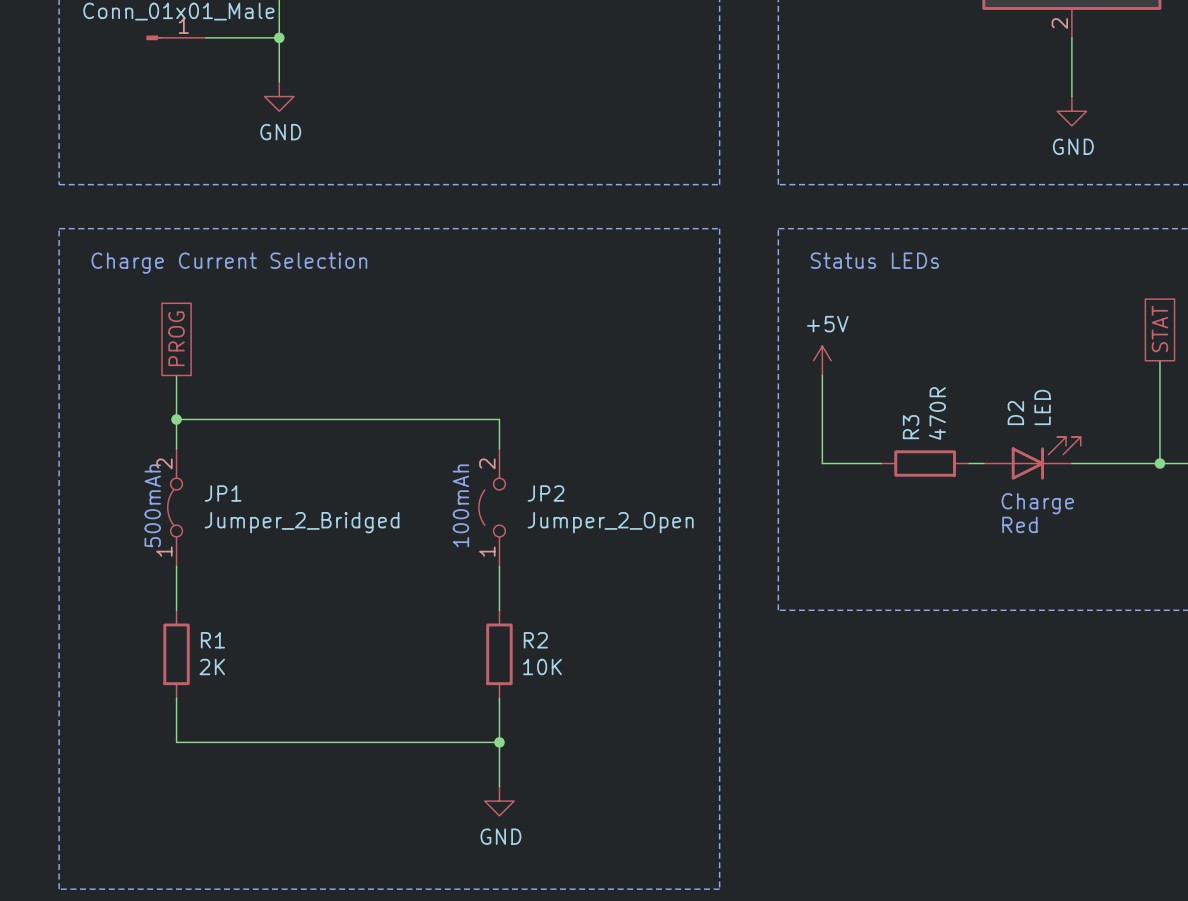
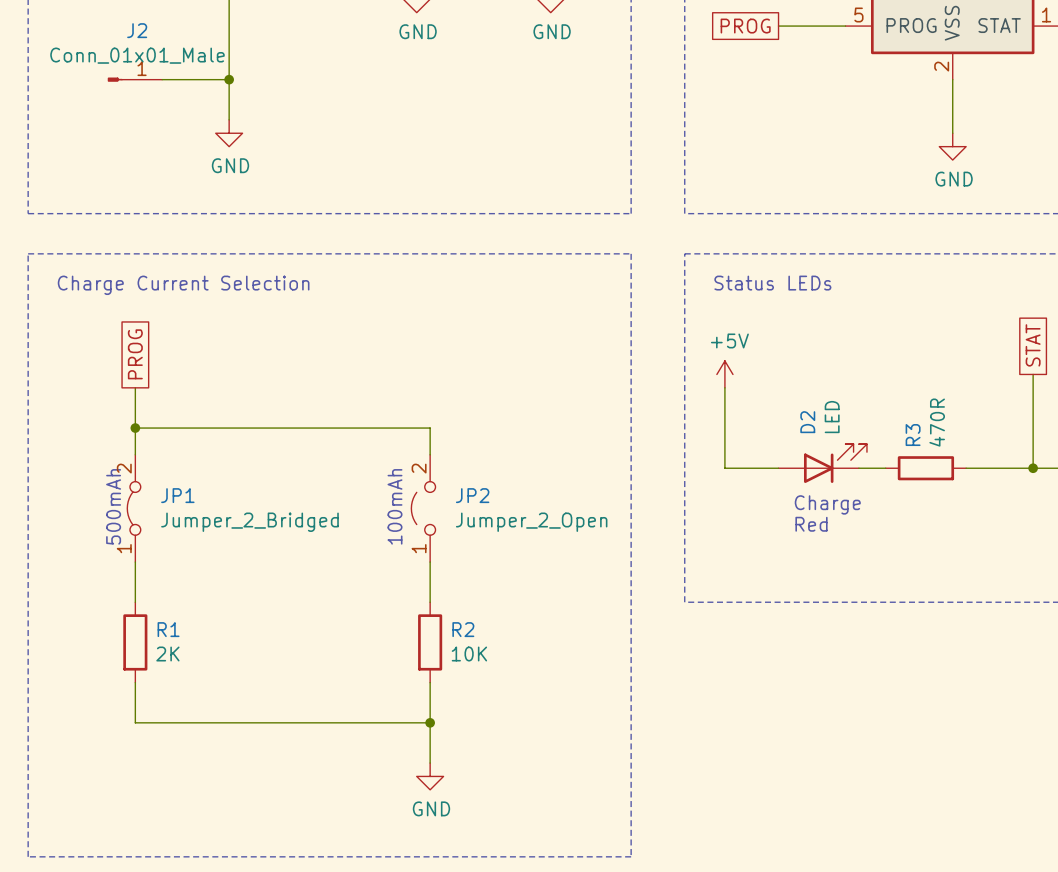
D2 position: (1032, 458) -> (822, 463)
R3 position: (925, 463) -> (925, 468)
text position: Charge (1037, 503) -> Charge (827, 504)
text position: Red (1019, 524) -> Red (811, 524)

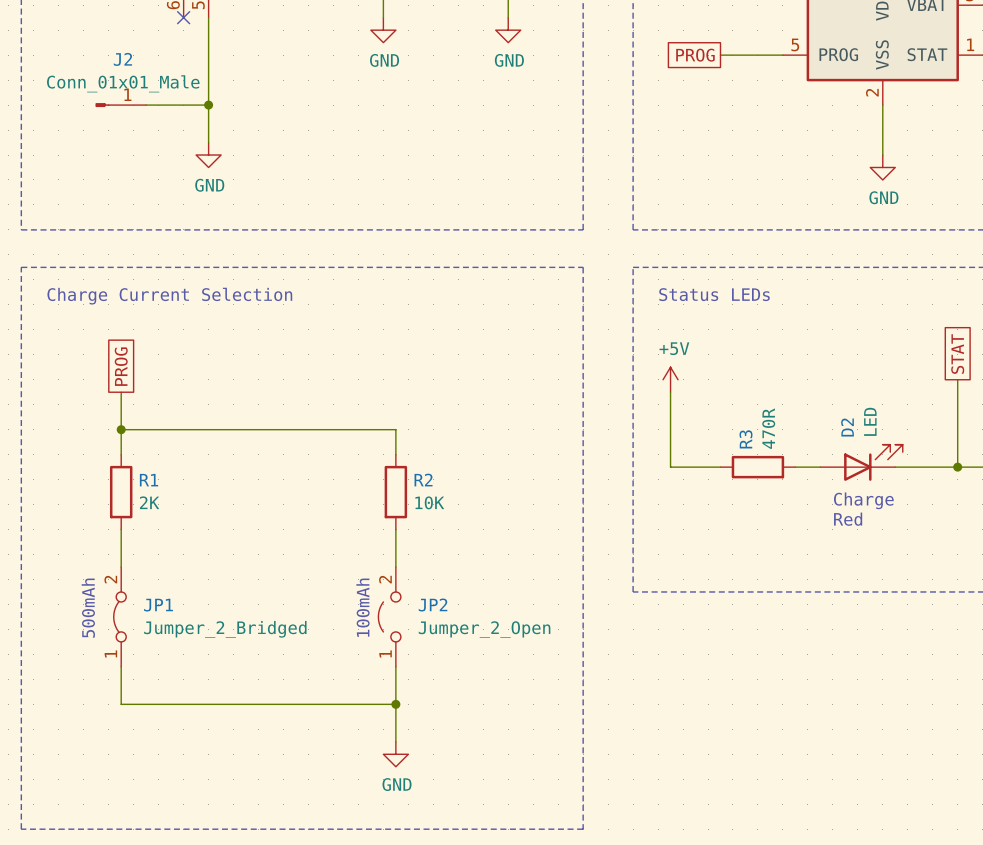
D2 position: (822, 463) -> (861, 462)
R3 position: (925, 468) -> (757, 467)
text position: Charge (827, 504) -> Charge (863, 500)
text position: 500mAh (113, 506) -> 500mAh (88, 608)
text position: 100mAh (395, 506) -> 100mAh (362, 607)
JP1 position: (134, 508) -> (119, 616)
JP2 position: (423, 508) -> (389, 616)
text position: Red (811, 524) -> Red (848, 519)
R1 position: (135, 642) -> (121, 492)
R2 position: (430, 642) -> (395, 492)

